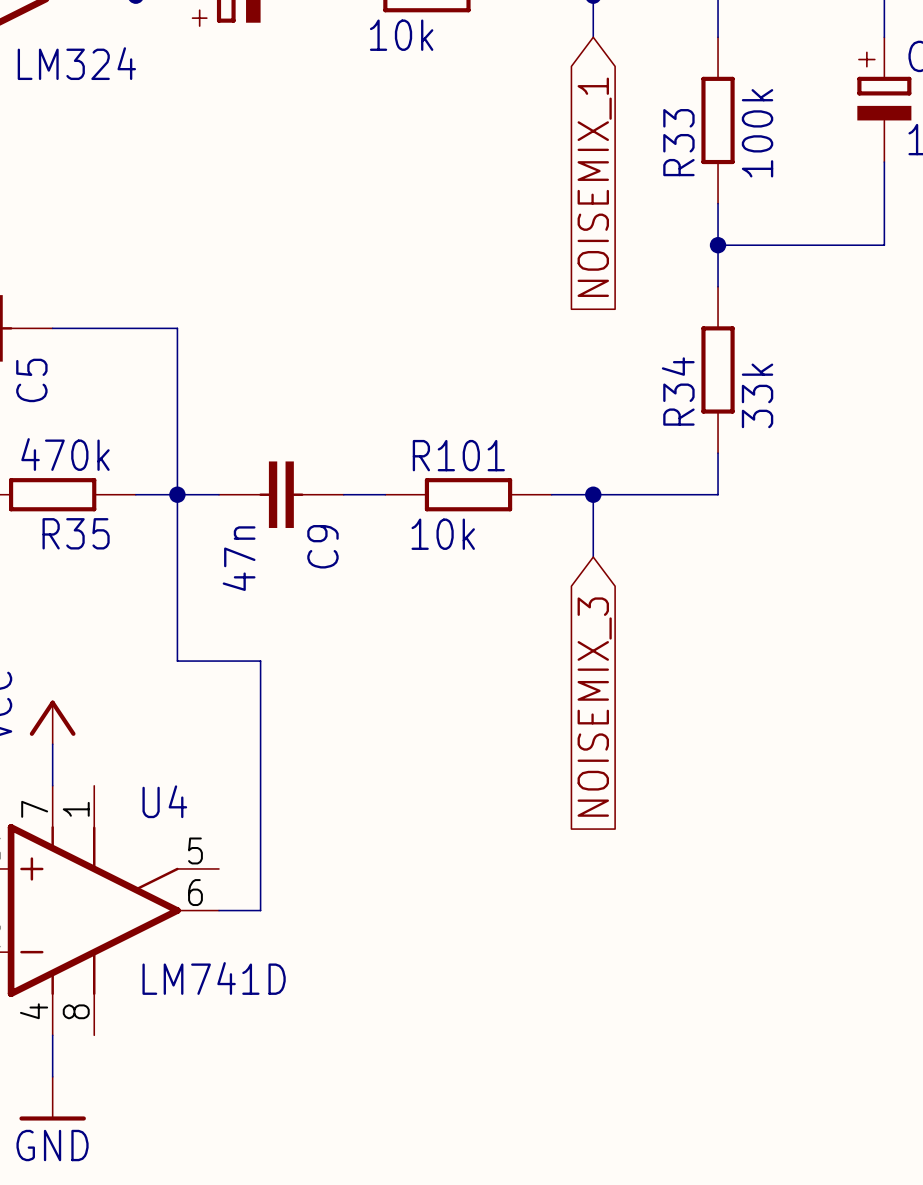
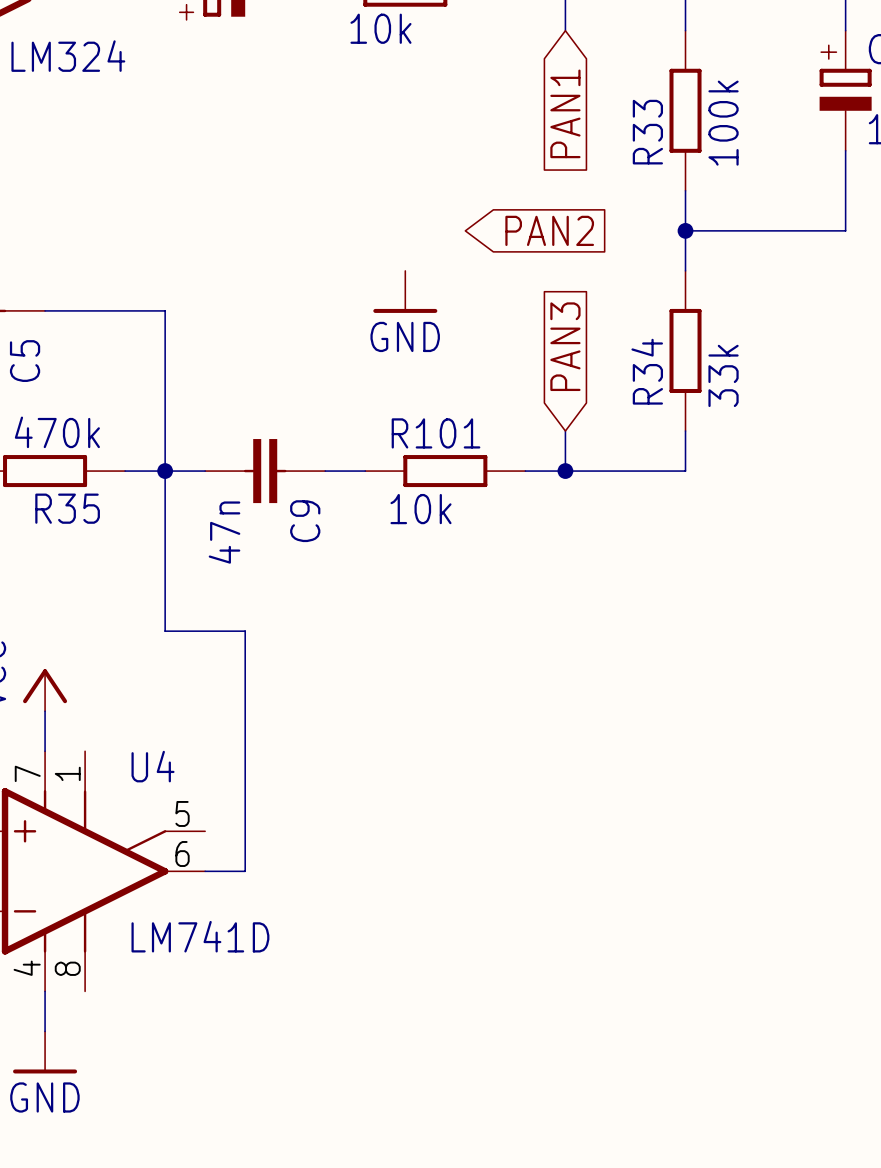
global label: NOISEMIX_1 (594, 187) -> PAN1 (565, 113)
global label: none -> PAN2 (549, 230)
power symbol: none -> GND (405, 291)
global label: none -> PAN3 (565, 346)
wire: (593, 494) (593, 557) -> (565, 471) (565, 431)
global label: NOISEMIX_3 (594, 707) -> none

